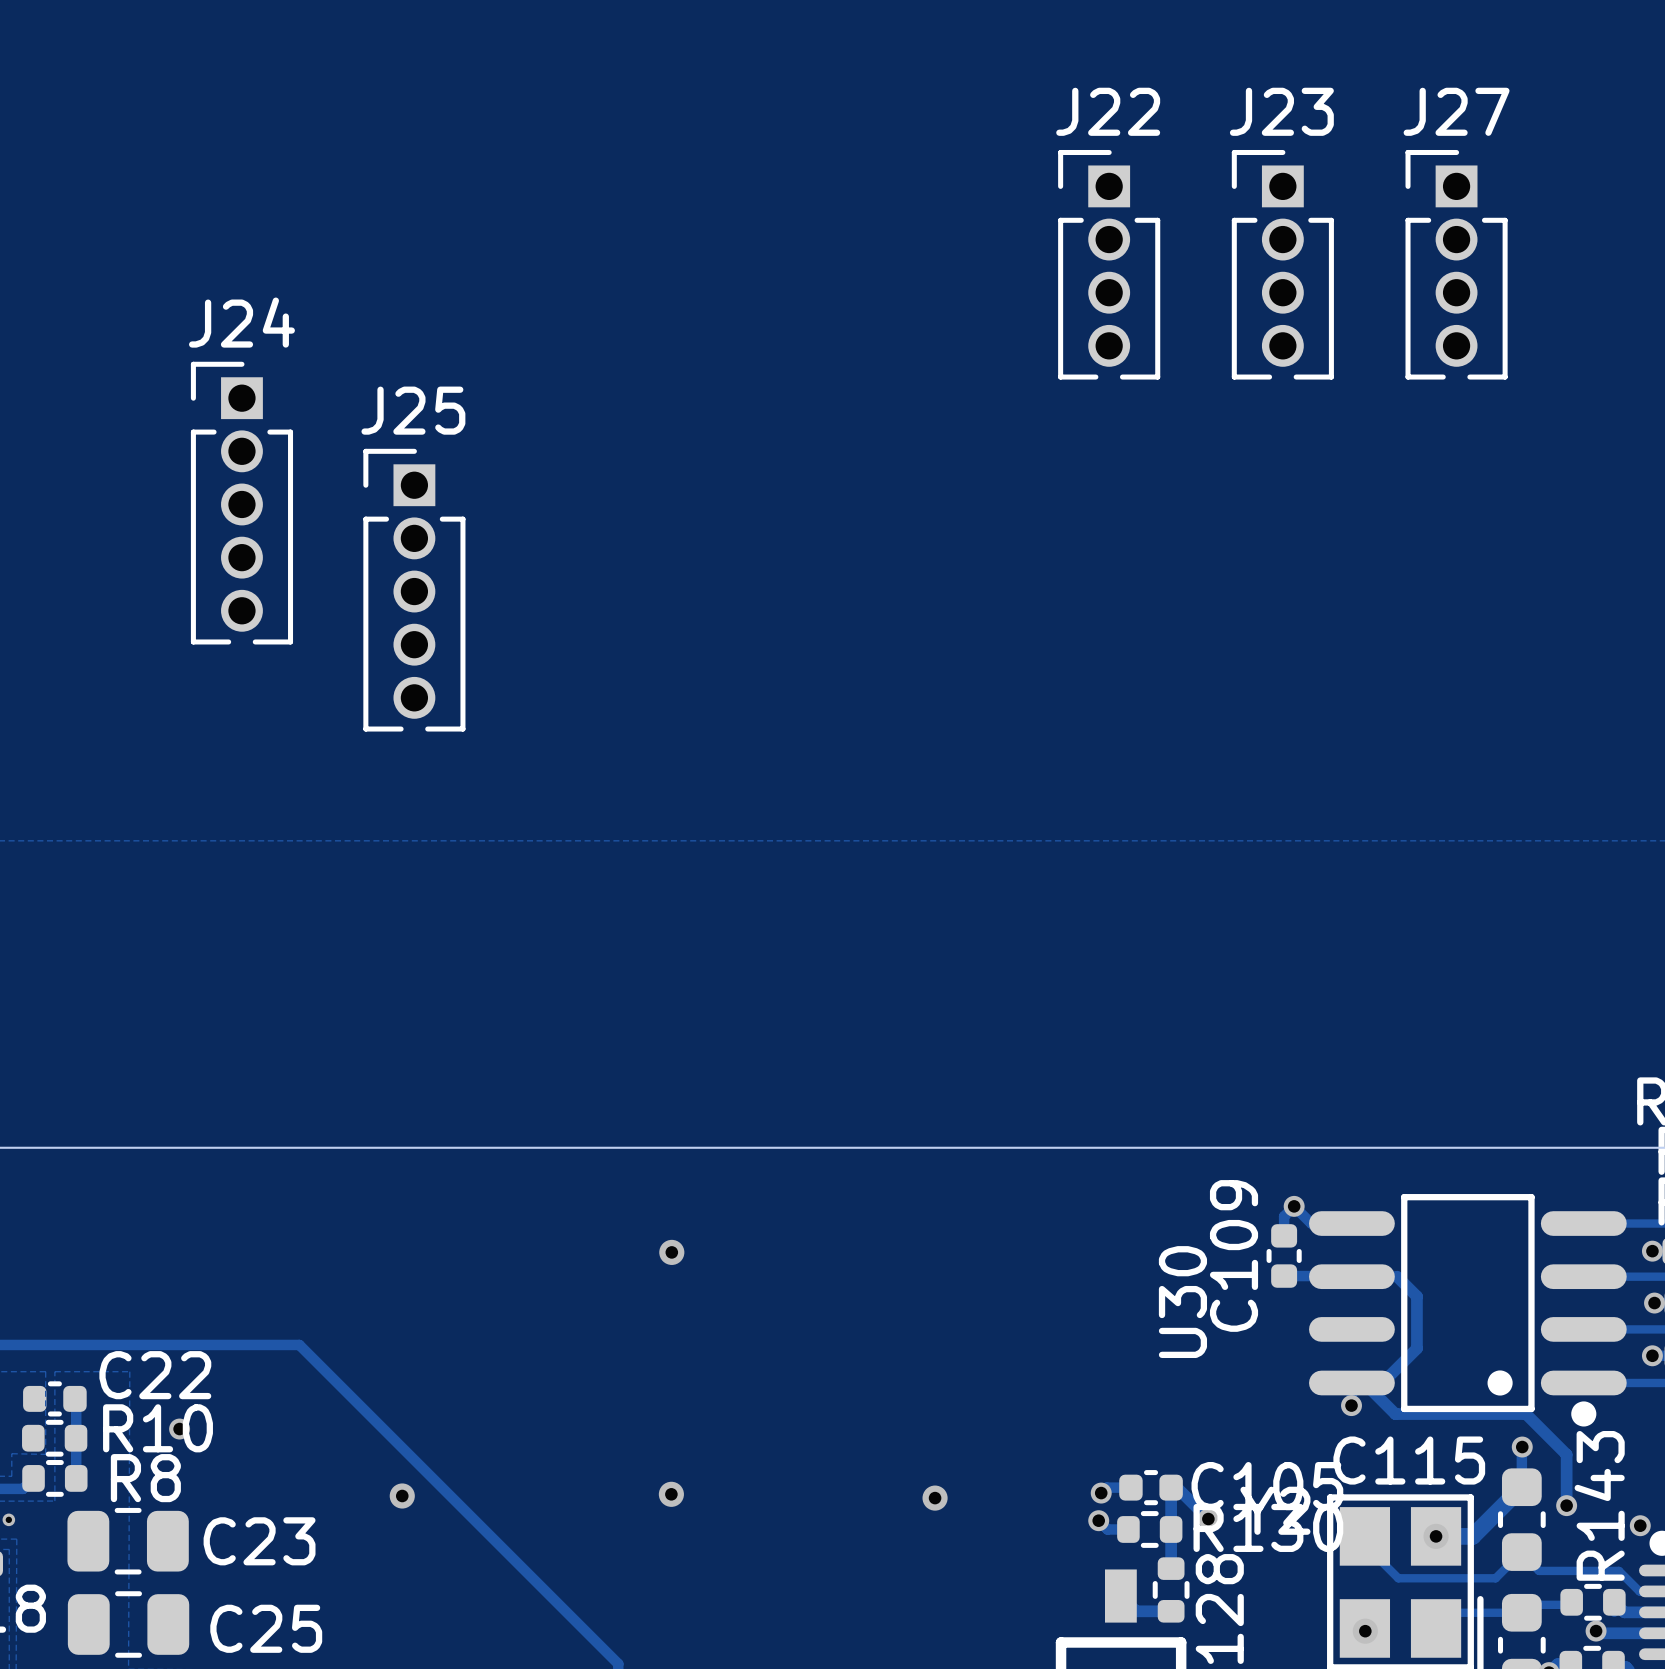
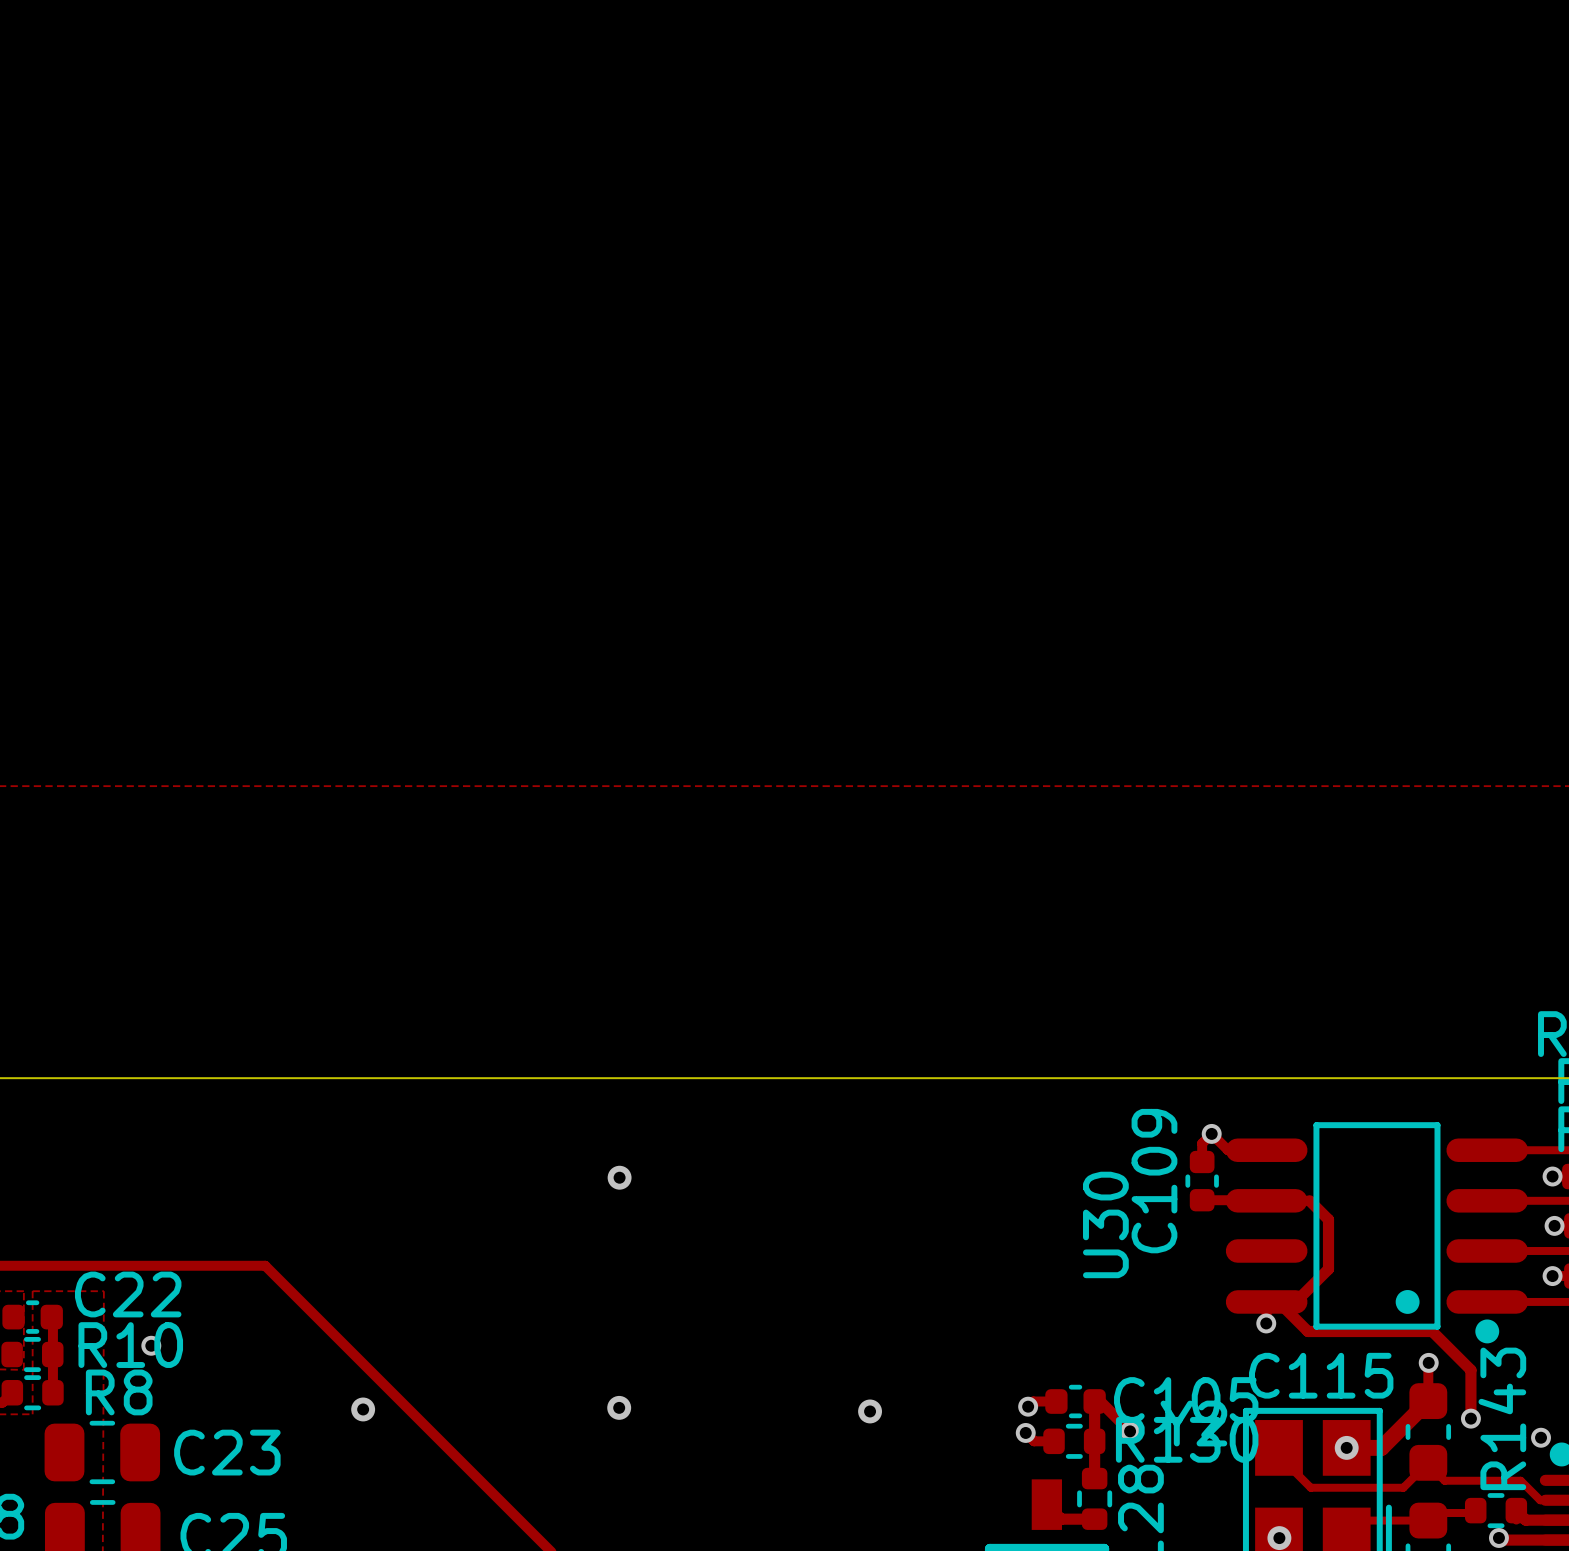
J22: (1109, 264) -> none
J23: (1282, 264) -> none
J27: (1456, 264) -> none
J24: (241, 503) -> none
J25: (414, 590) -> none

